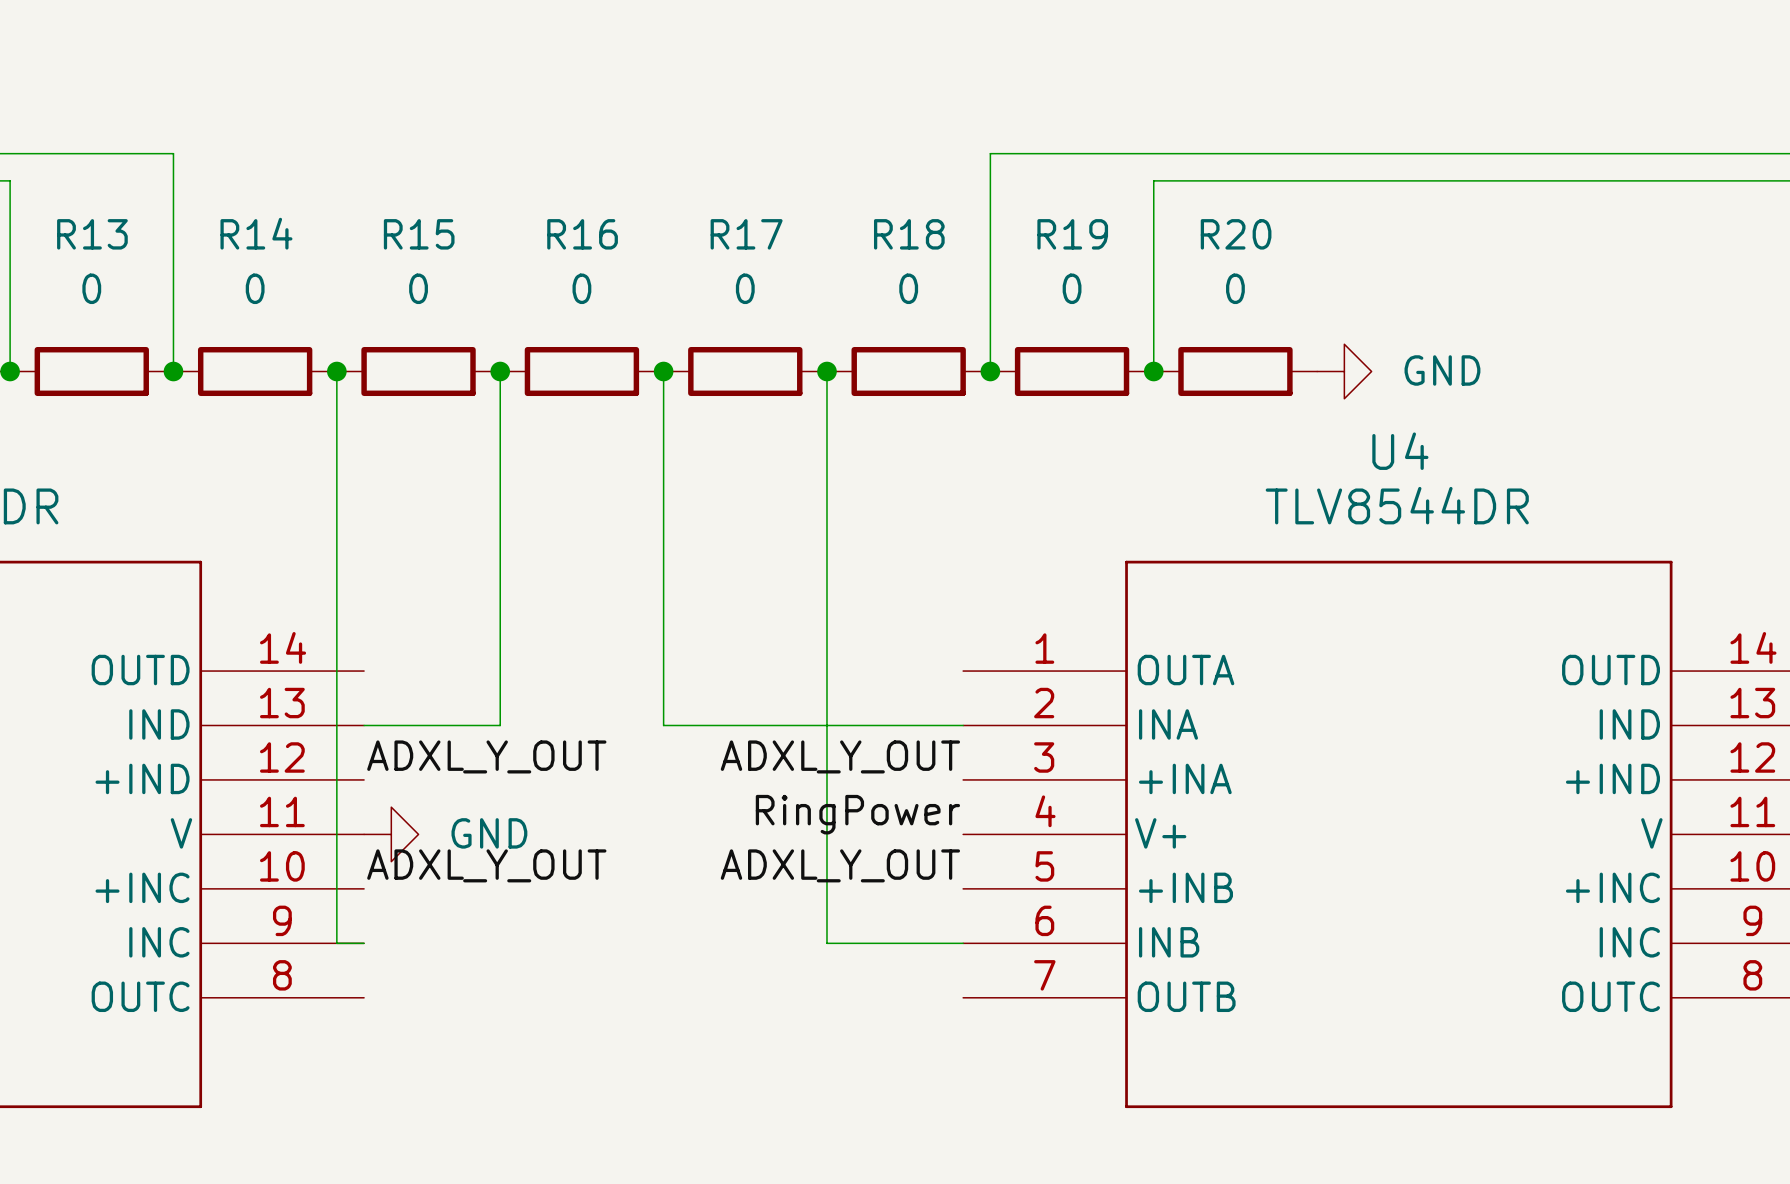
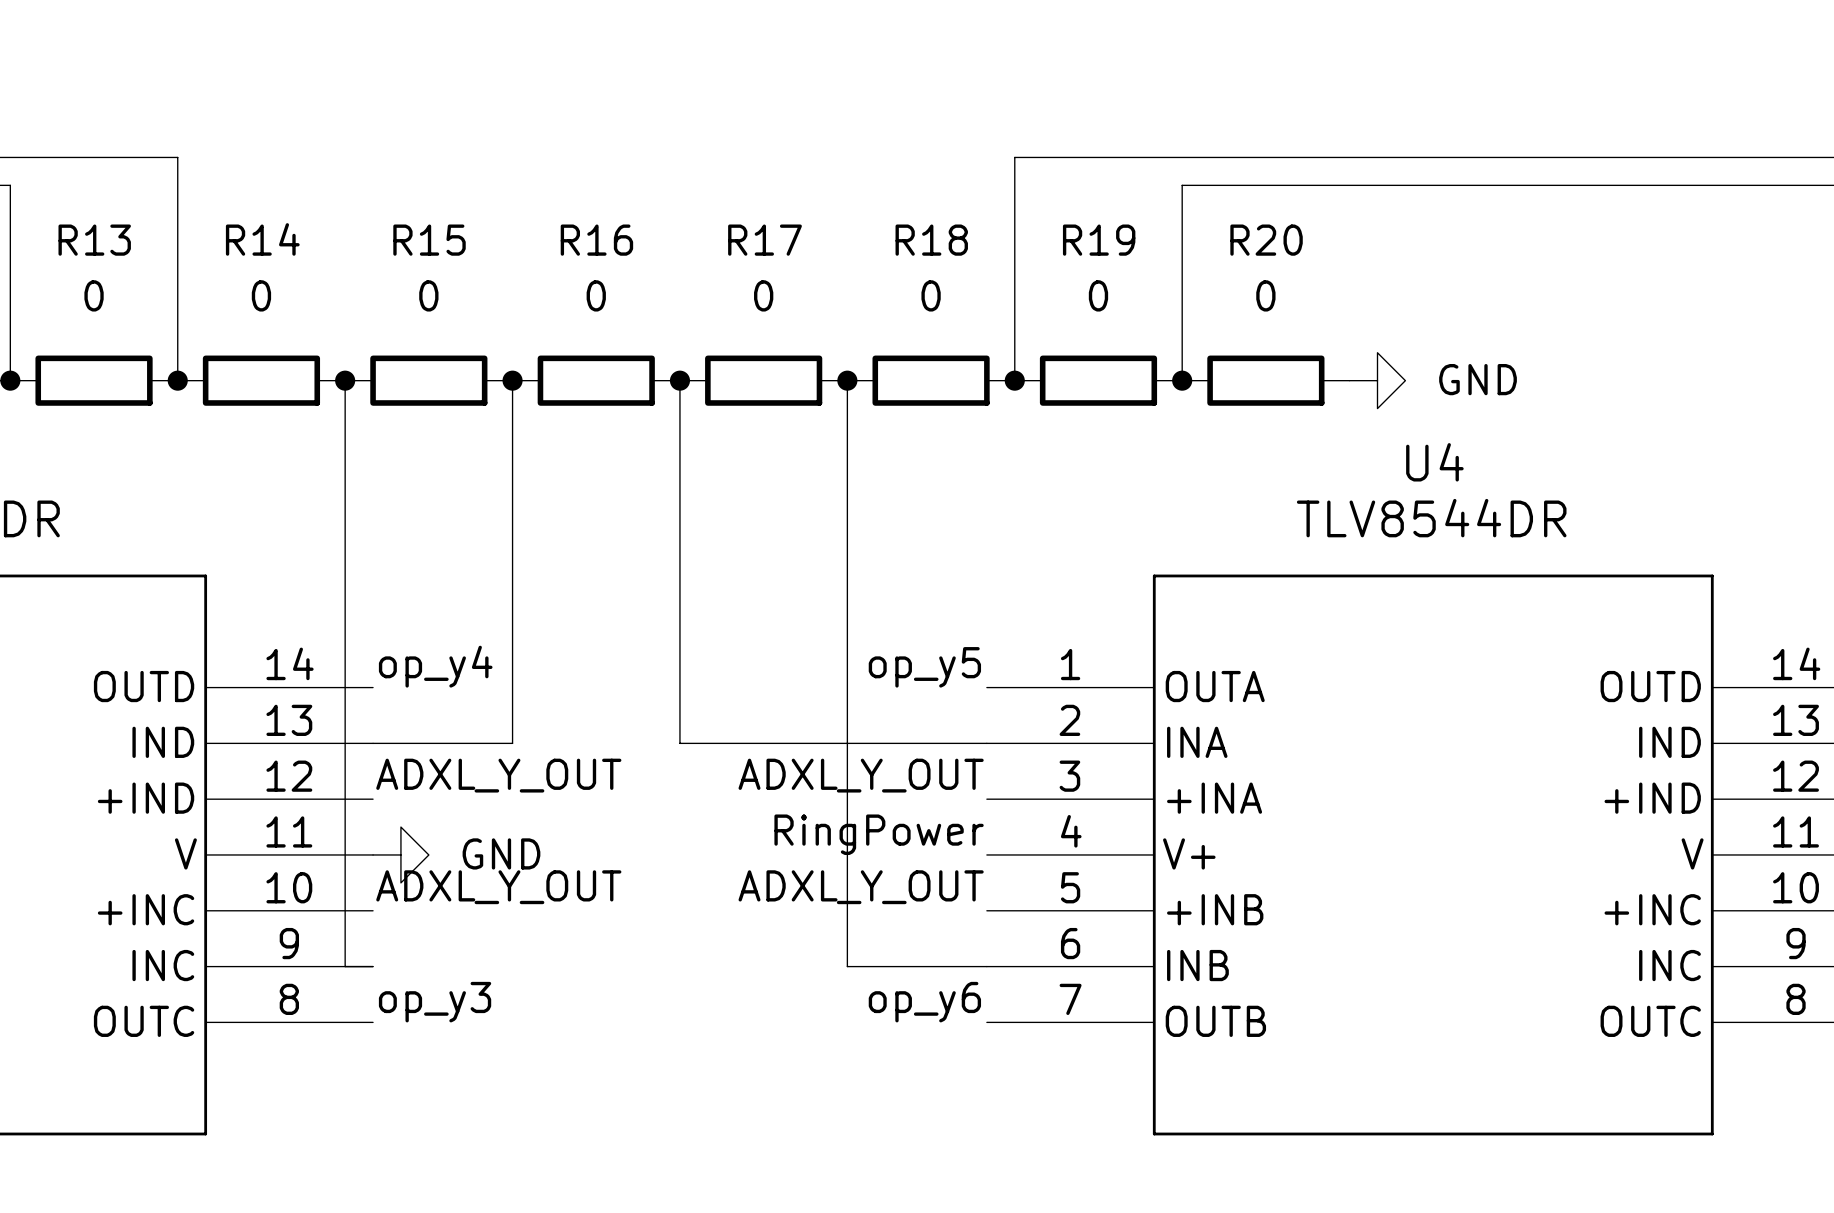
label: none -> op_y4 (435, 666)
label: none -> op_y5 (924, 667)
label: none -> op_y3 (435, 1002)
label: none -> op_y6 (924, 1002)

